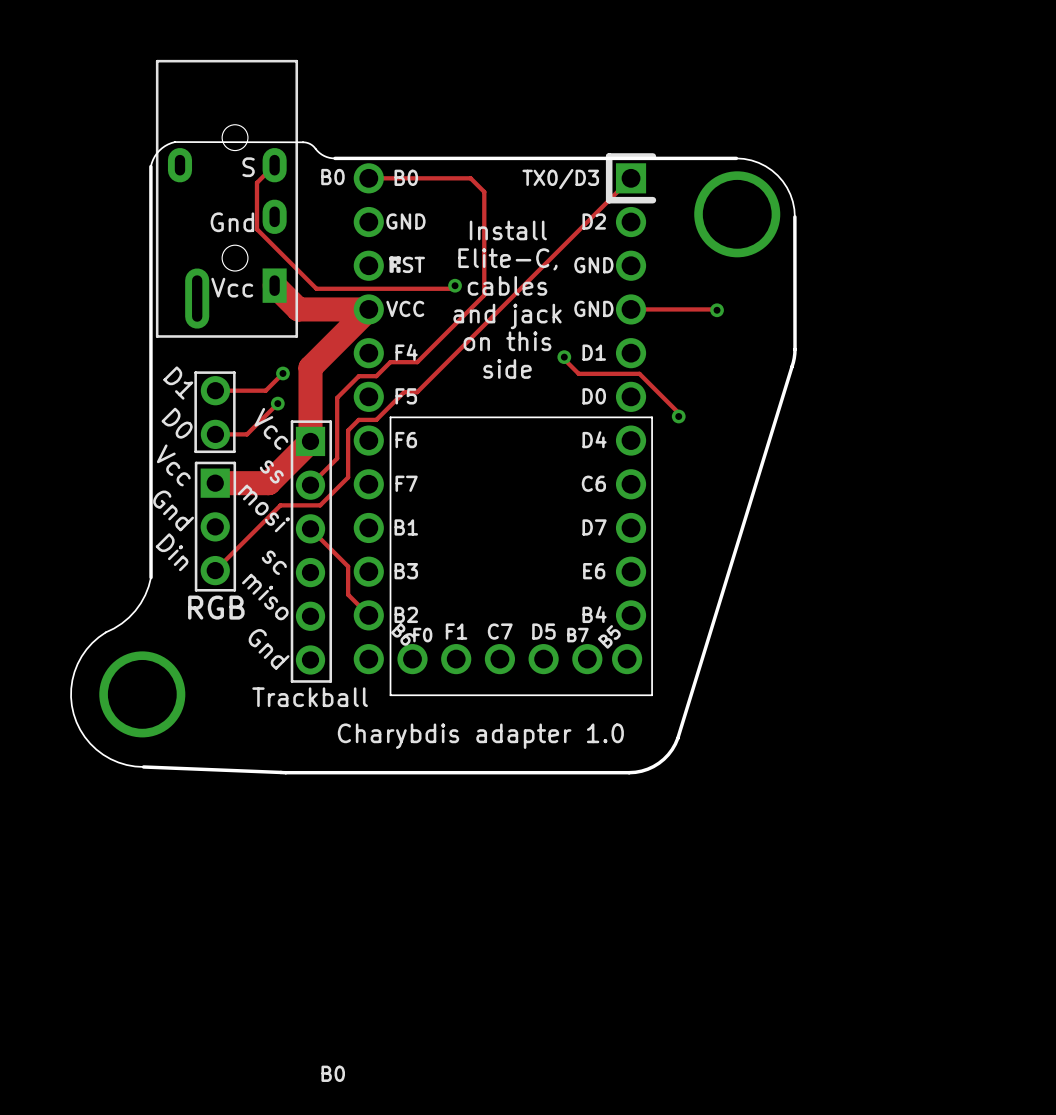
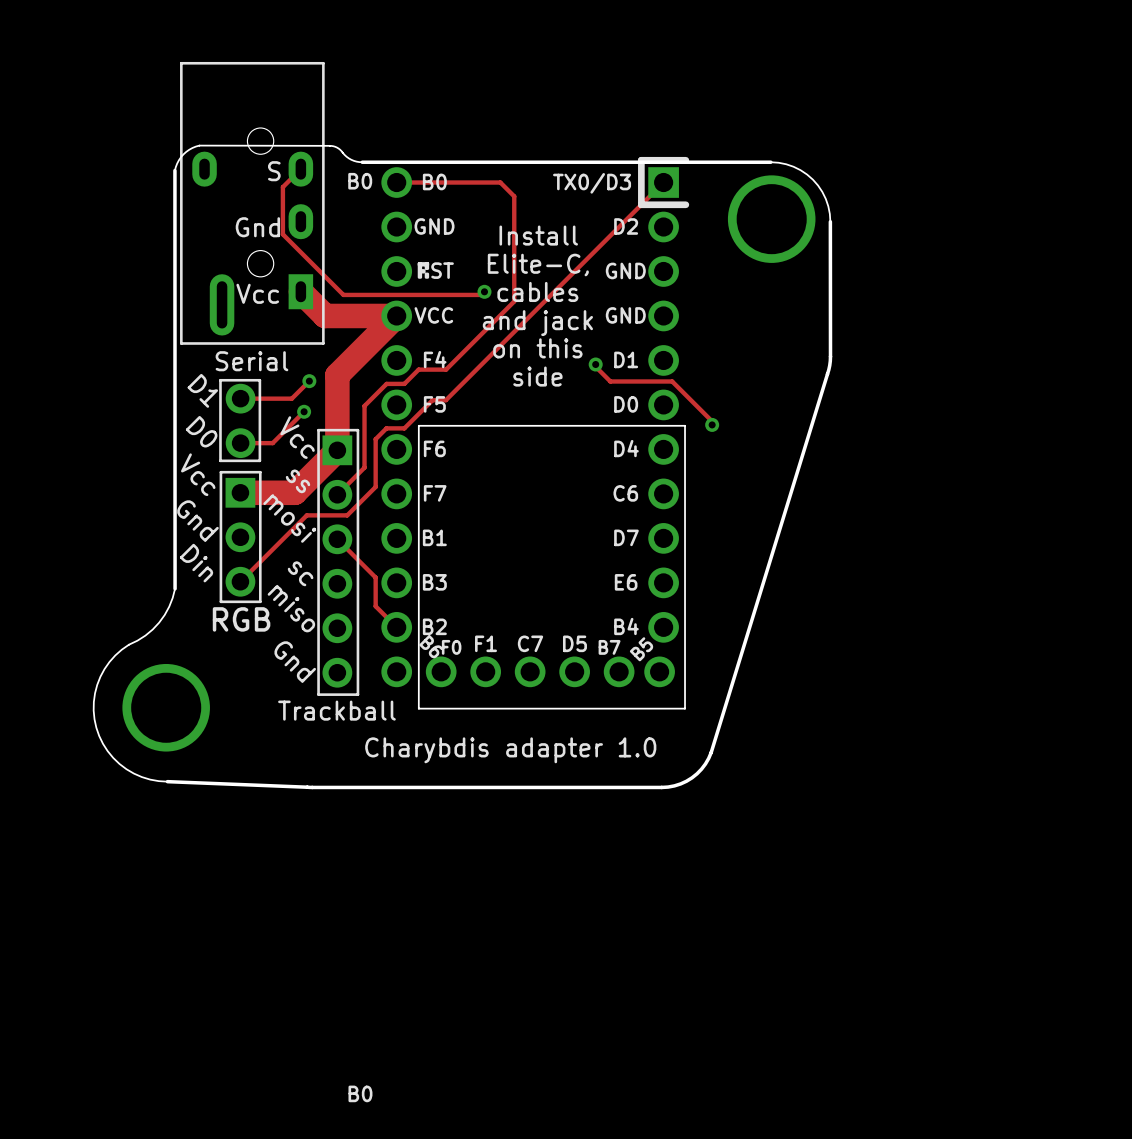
track: (631, 309) (717, 310) -> none
via: (717, 310) -> none
text: none -> Serial (251, 361)

